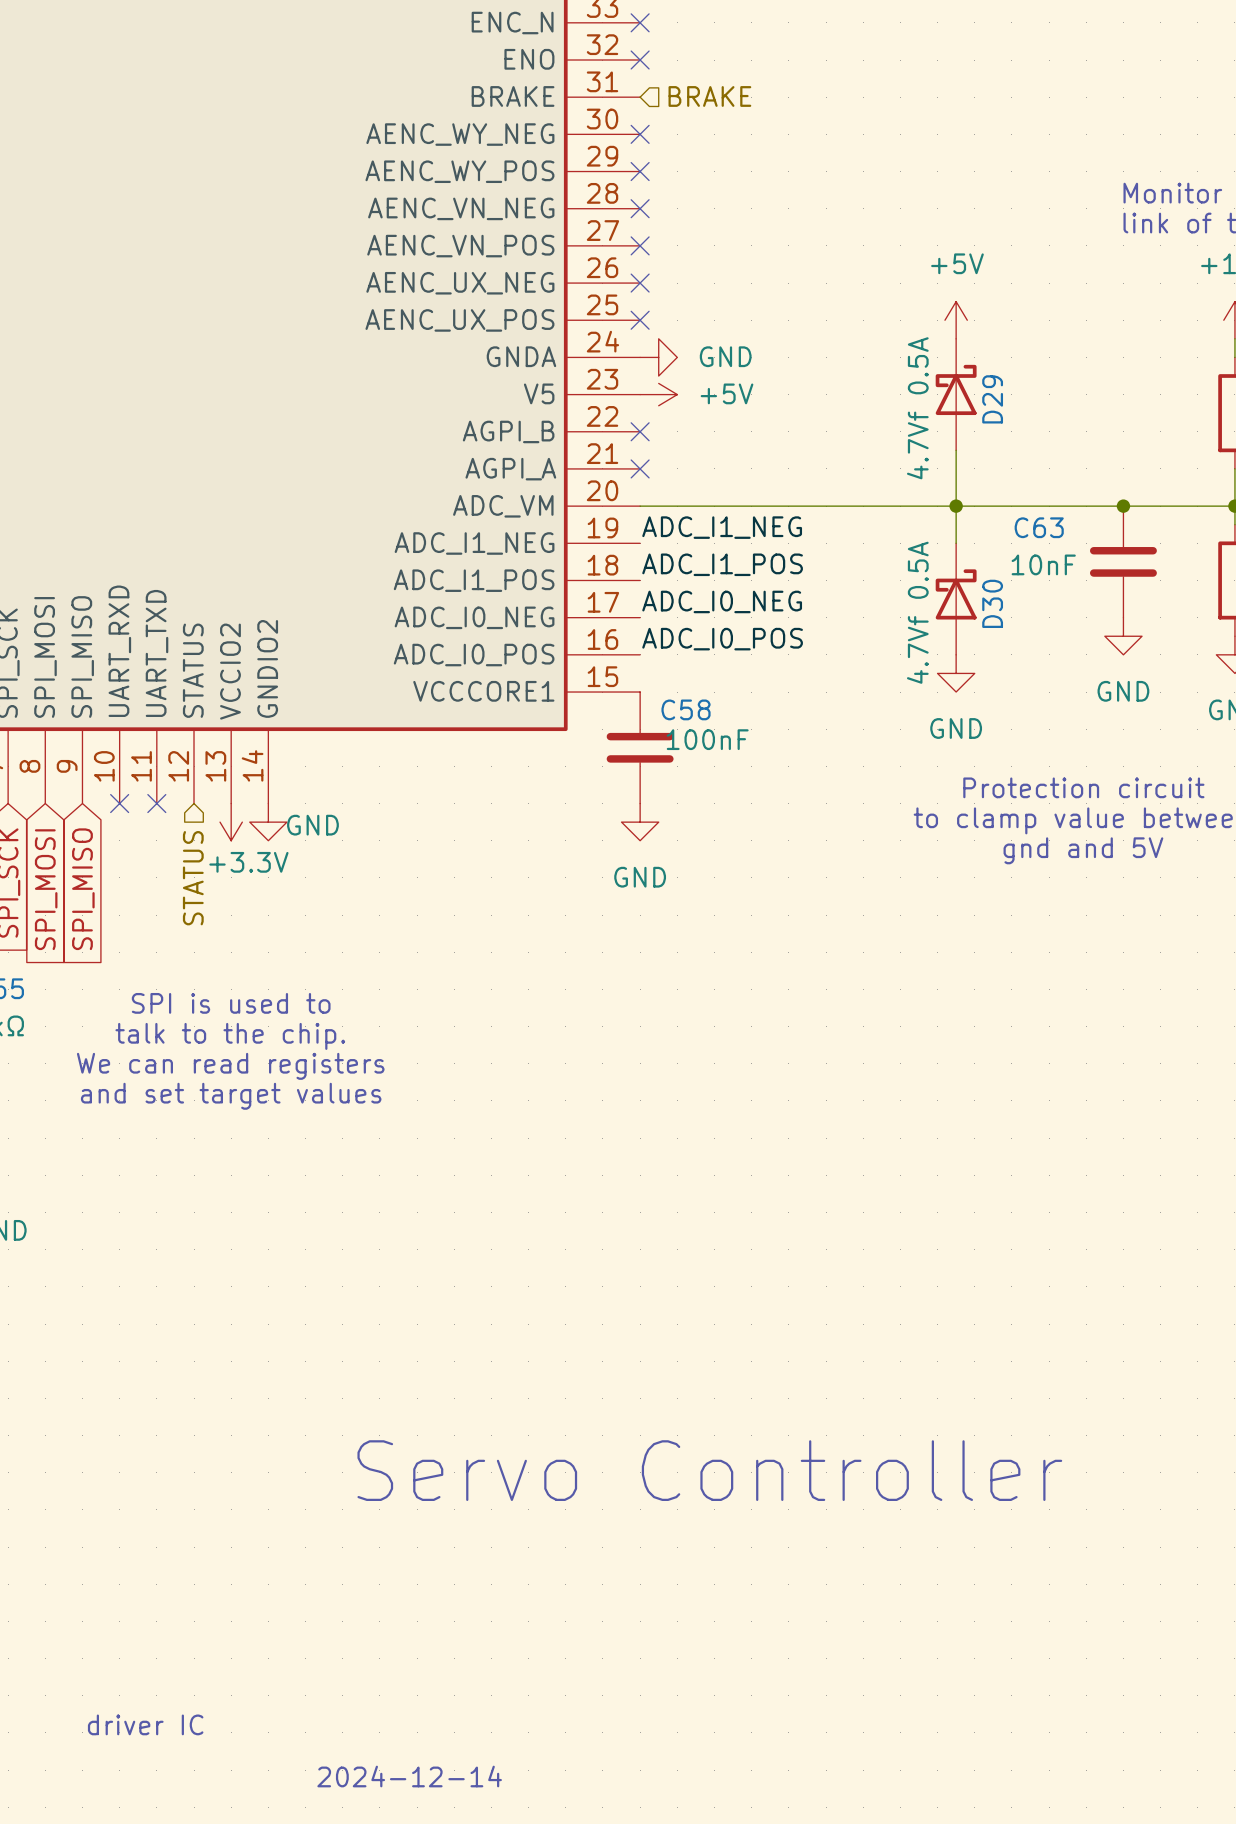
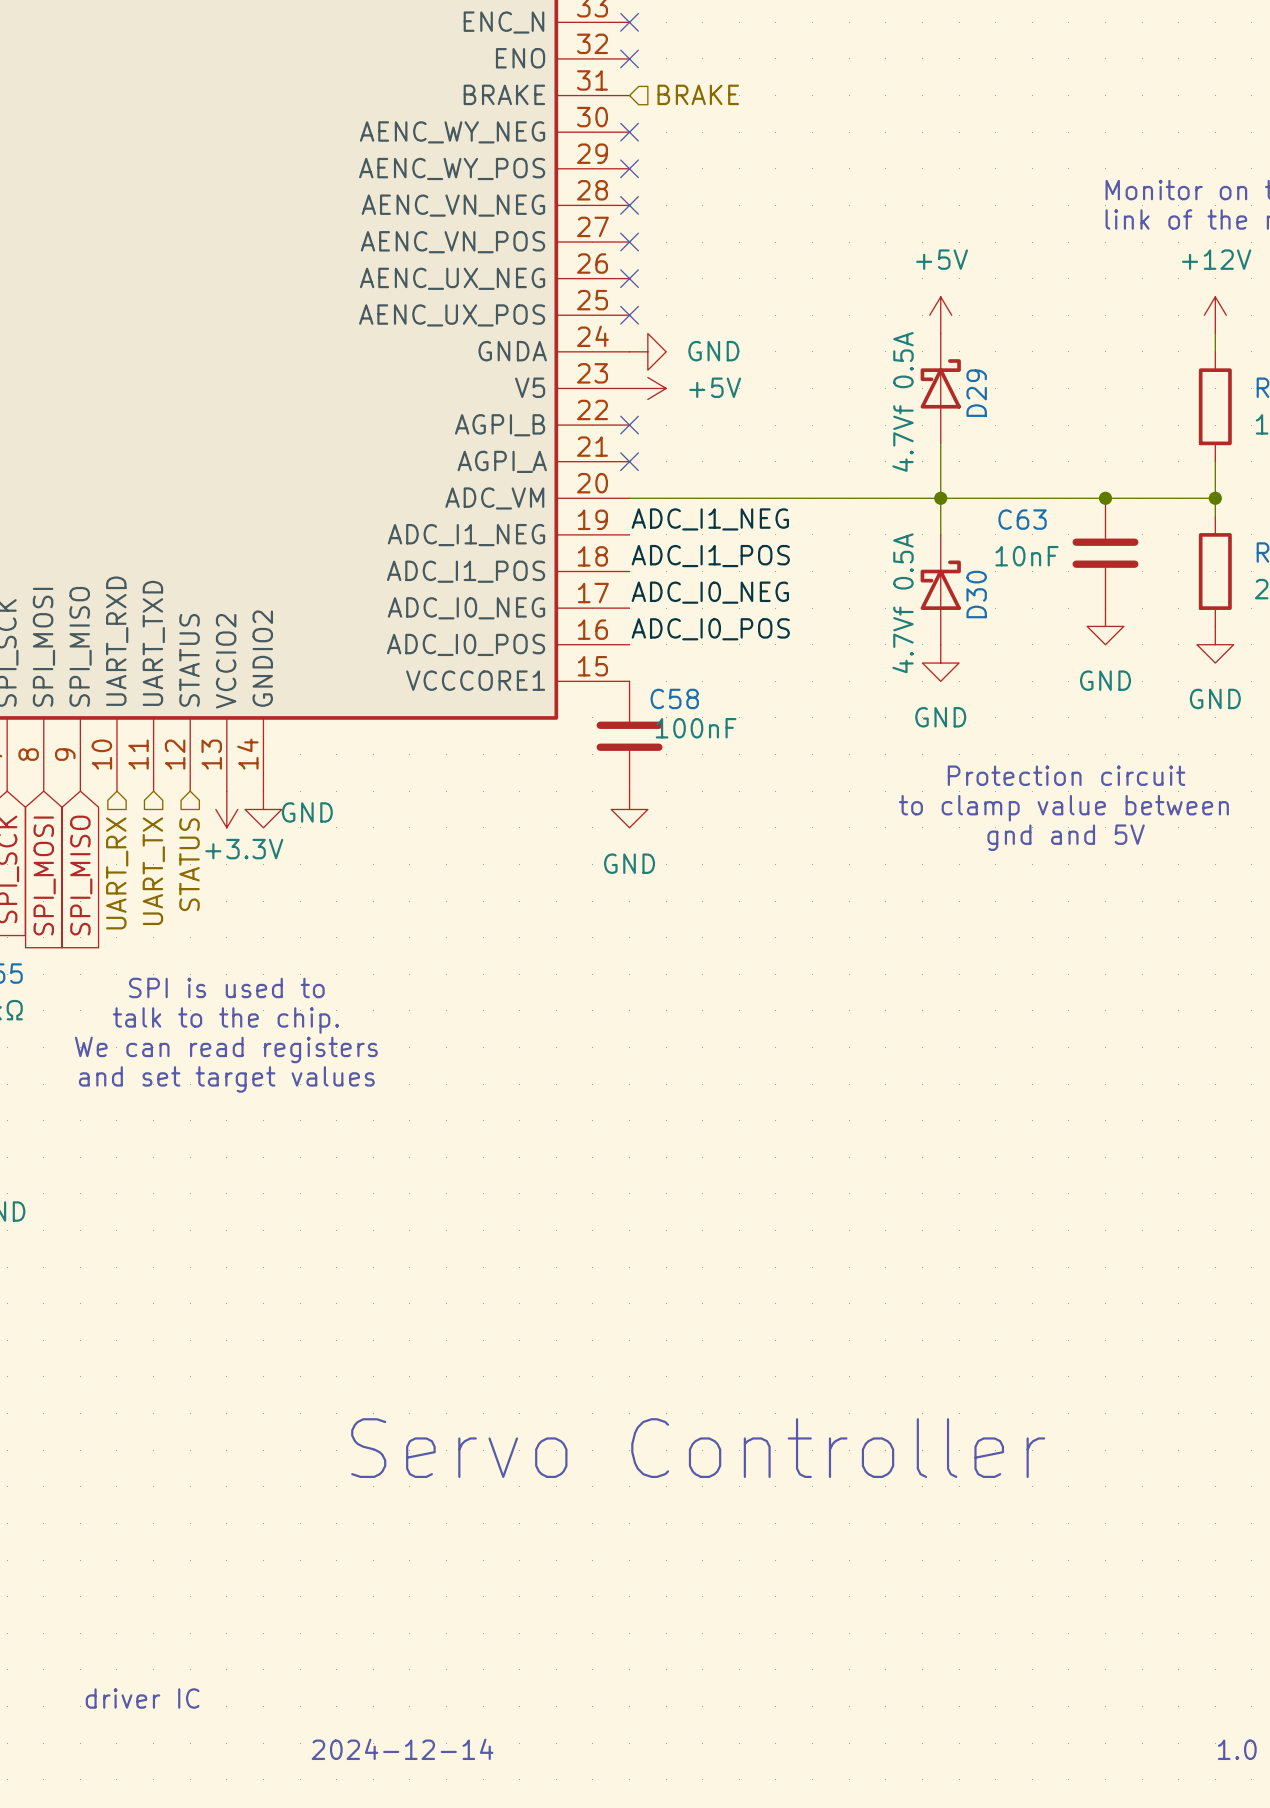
no-connect mark: (119, 803) -> none
no-connect mark: (156, 803) -> none
hierarchical label: none -> UART_TX (153, 871)
hierarchical label: none -> UART_RX (117, 873)

